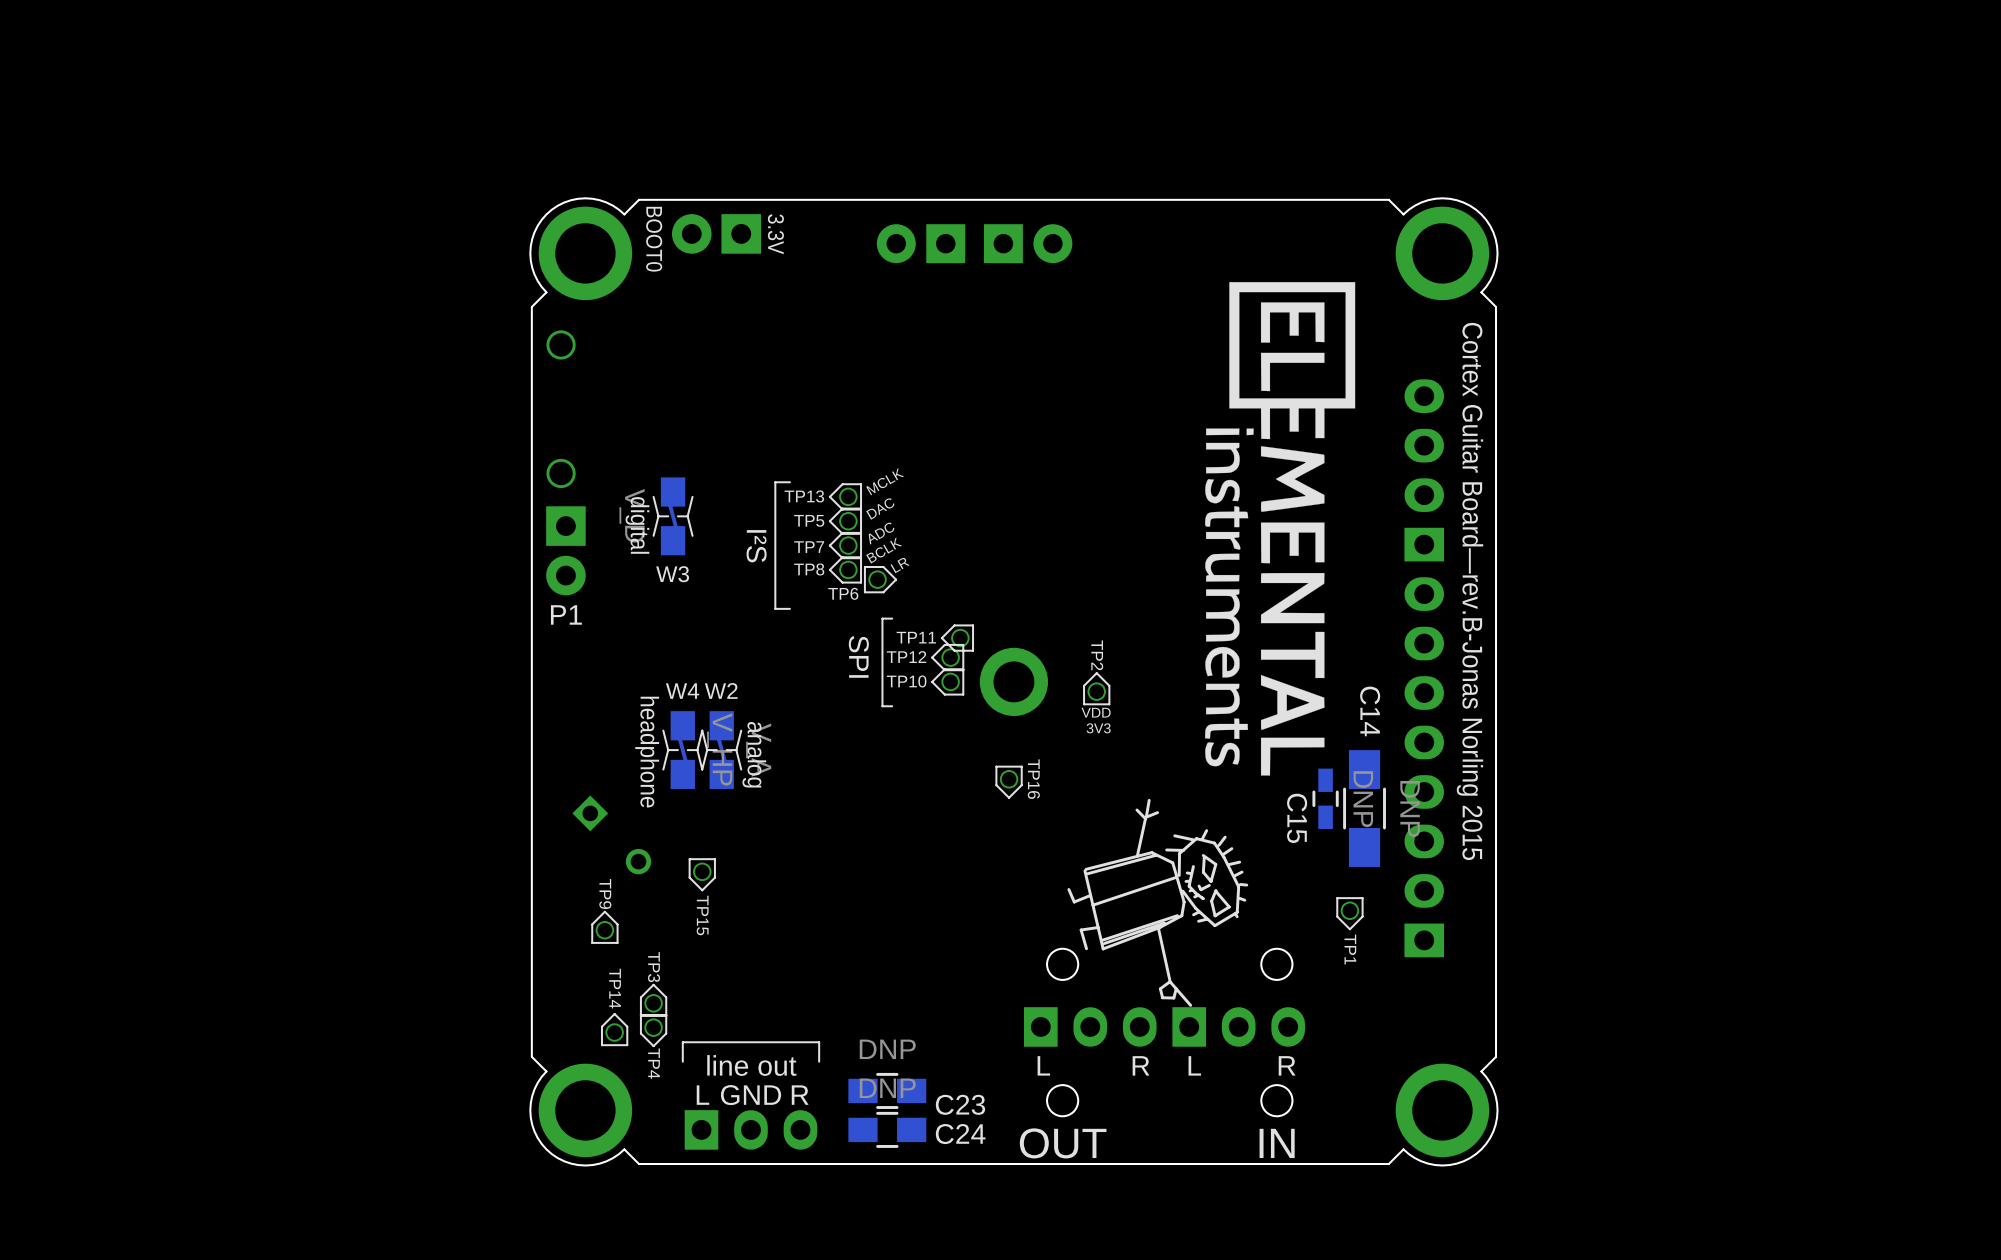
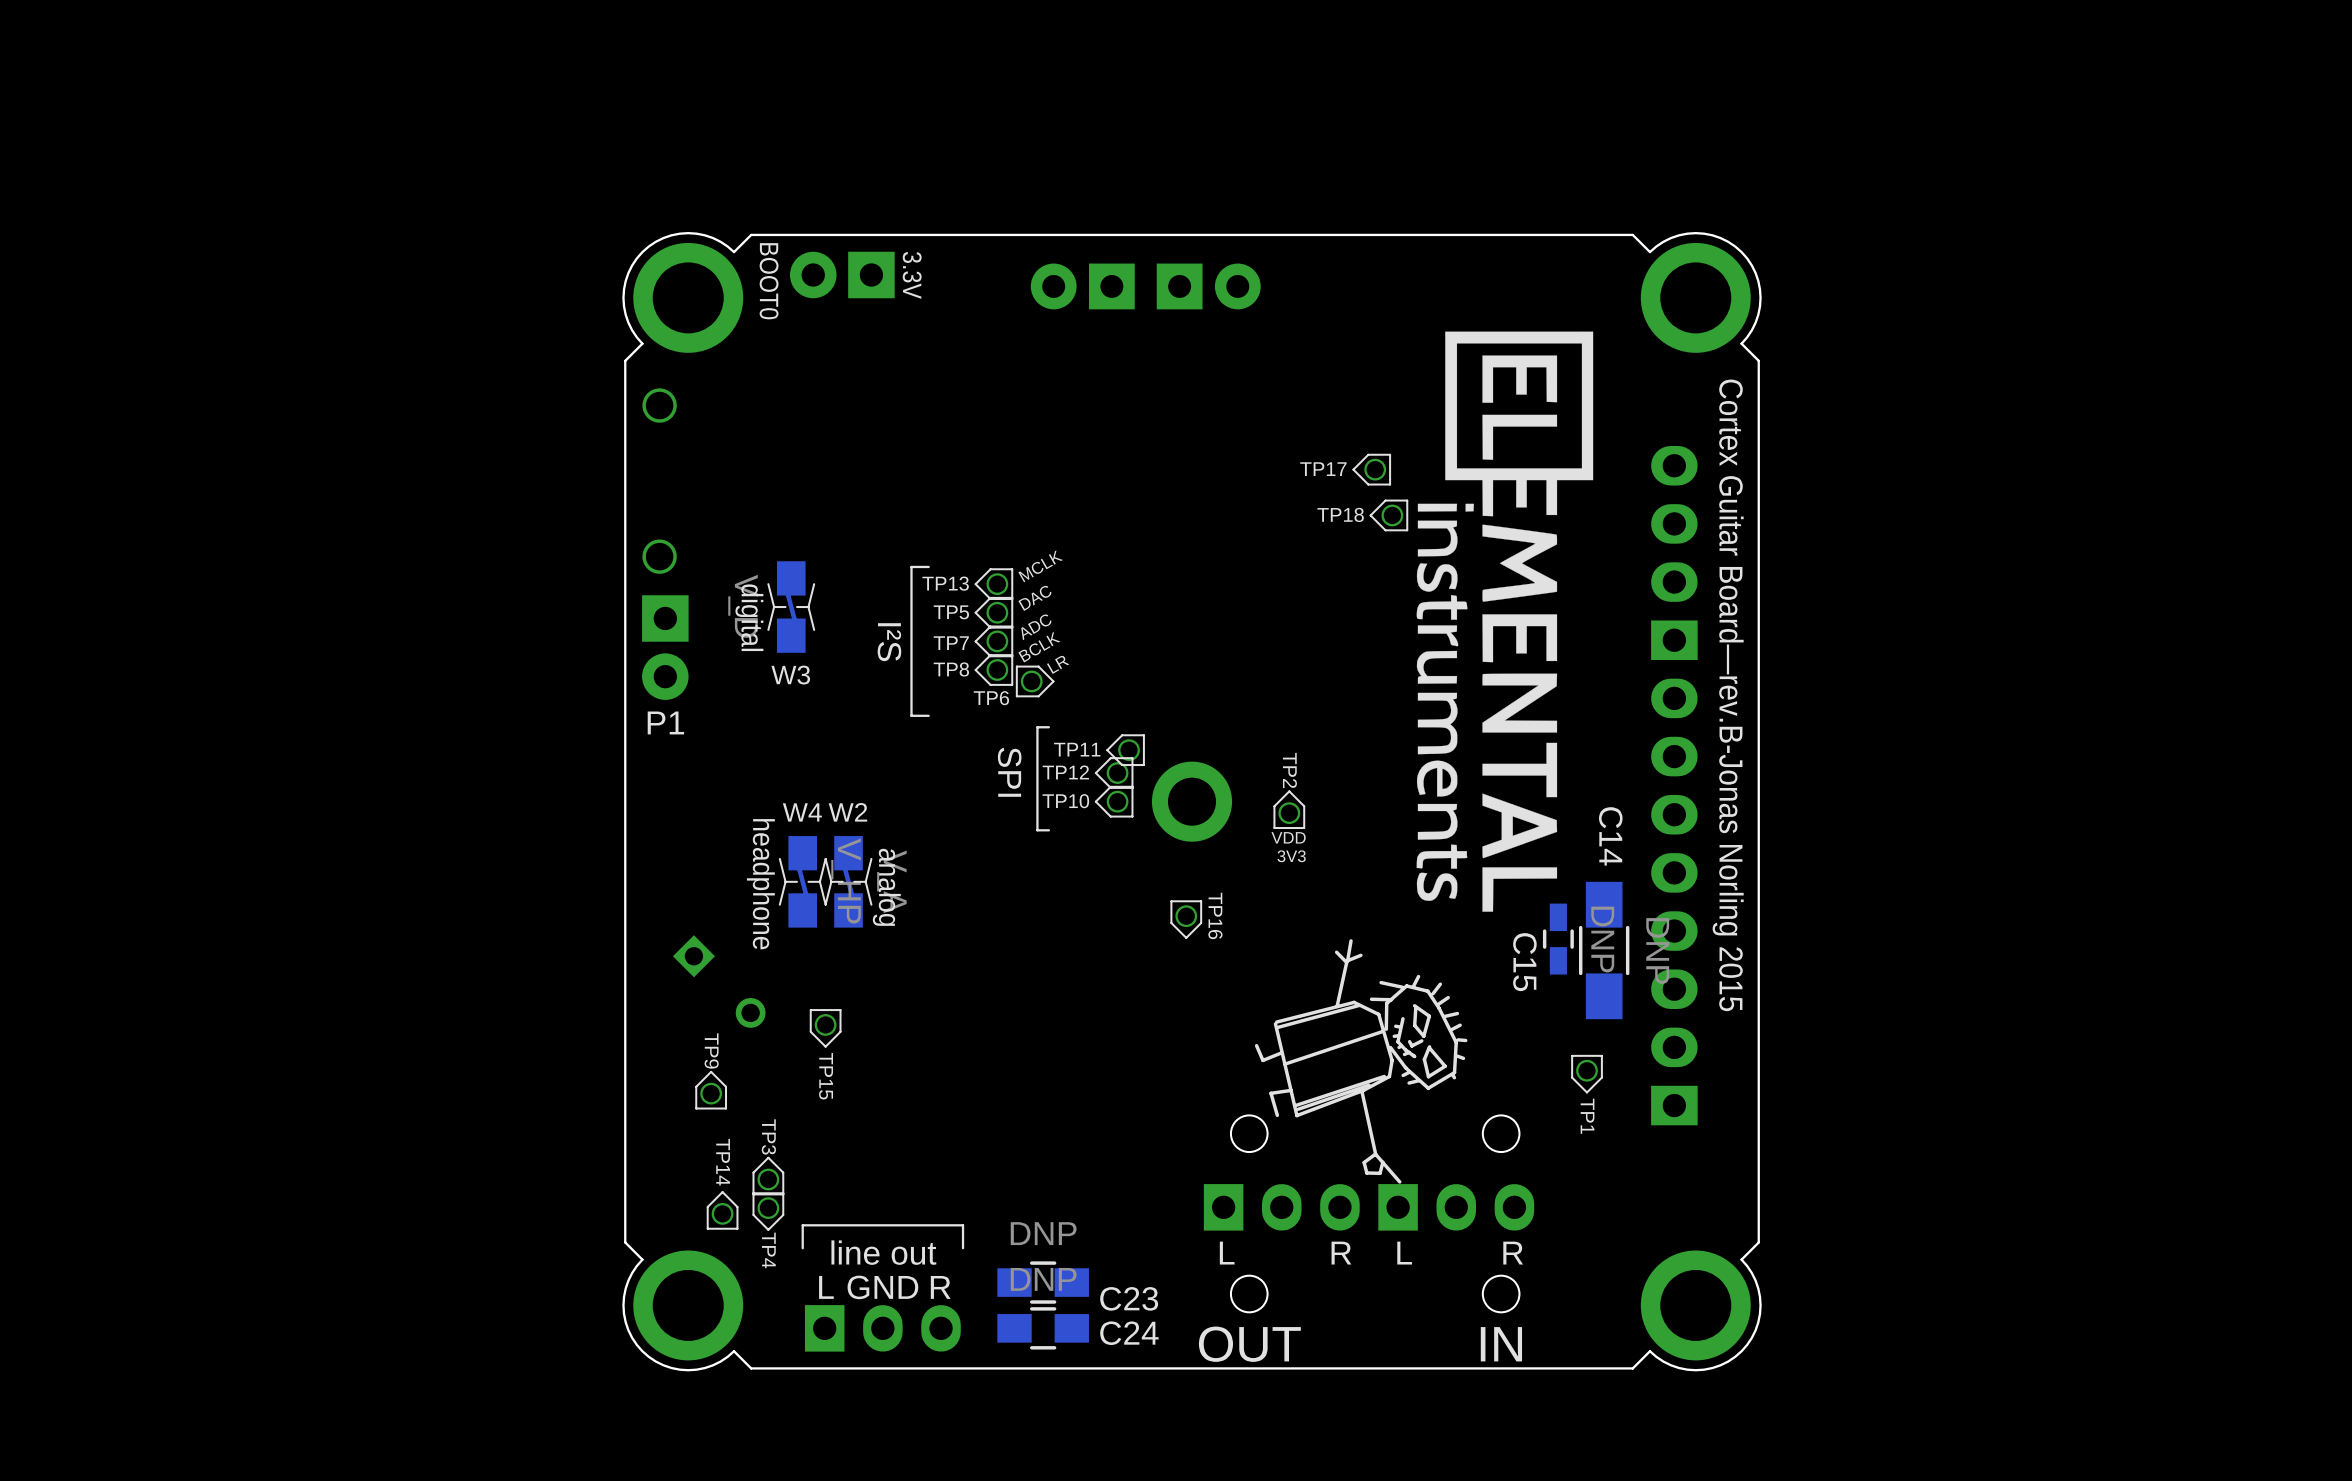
TP17: none -> (1371, 469)
TP18: none -> (1388, 515)

